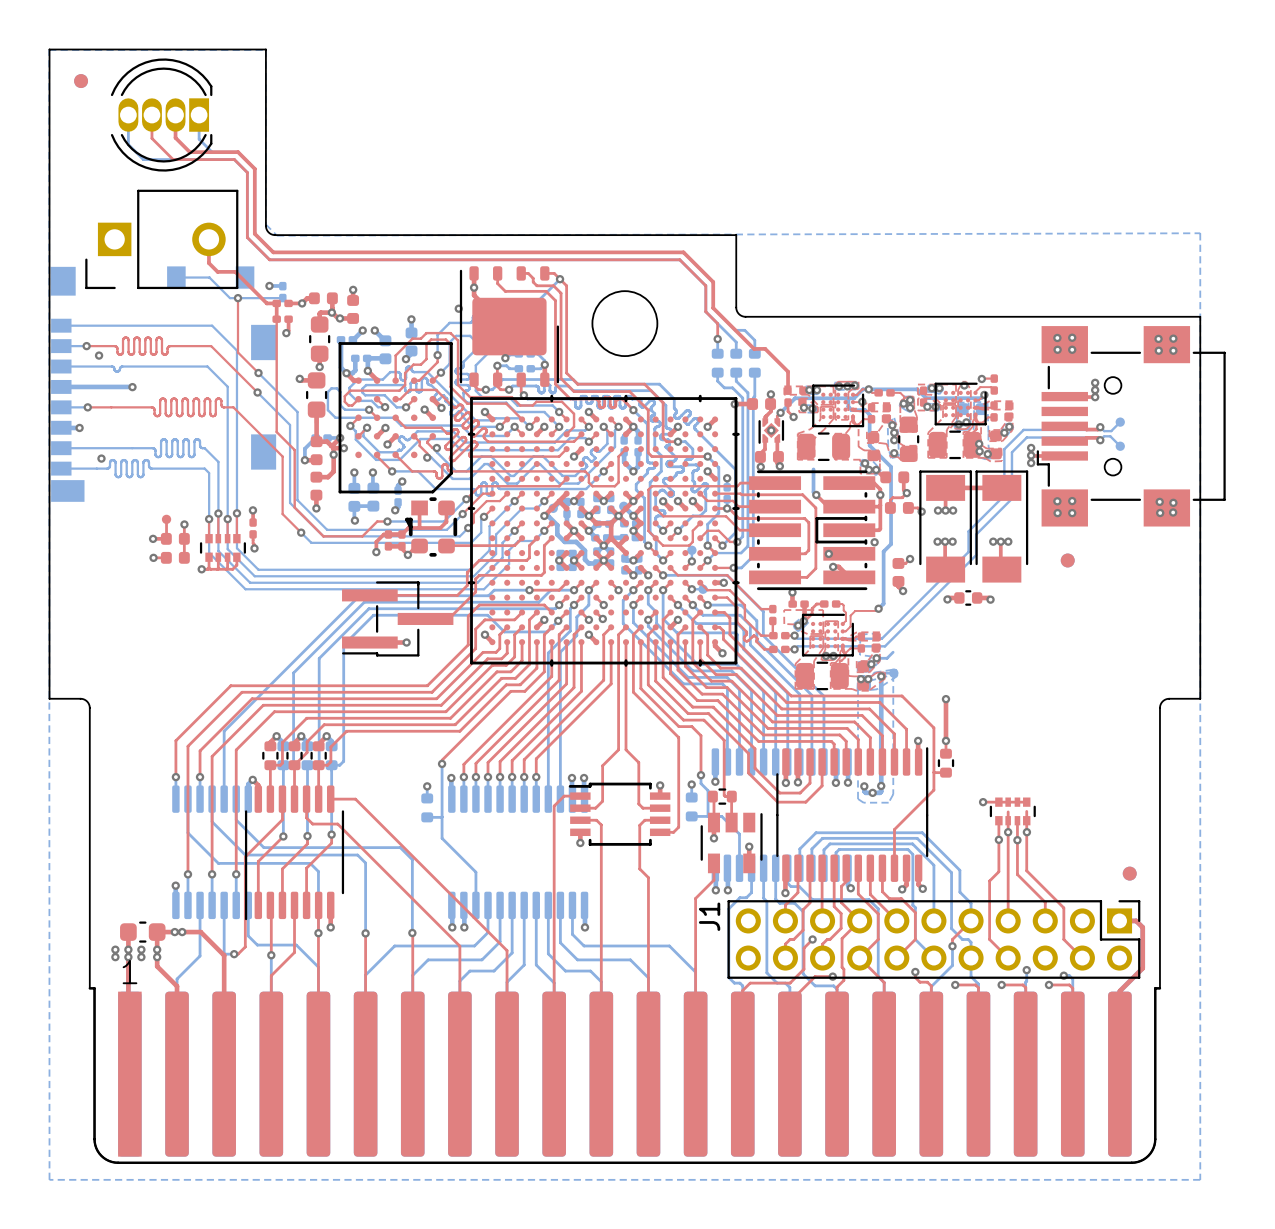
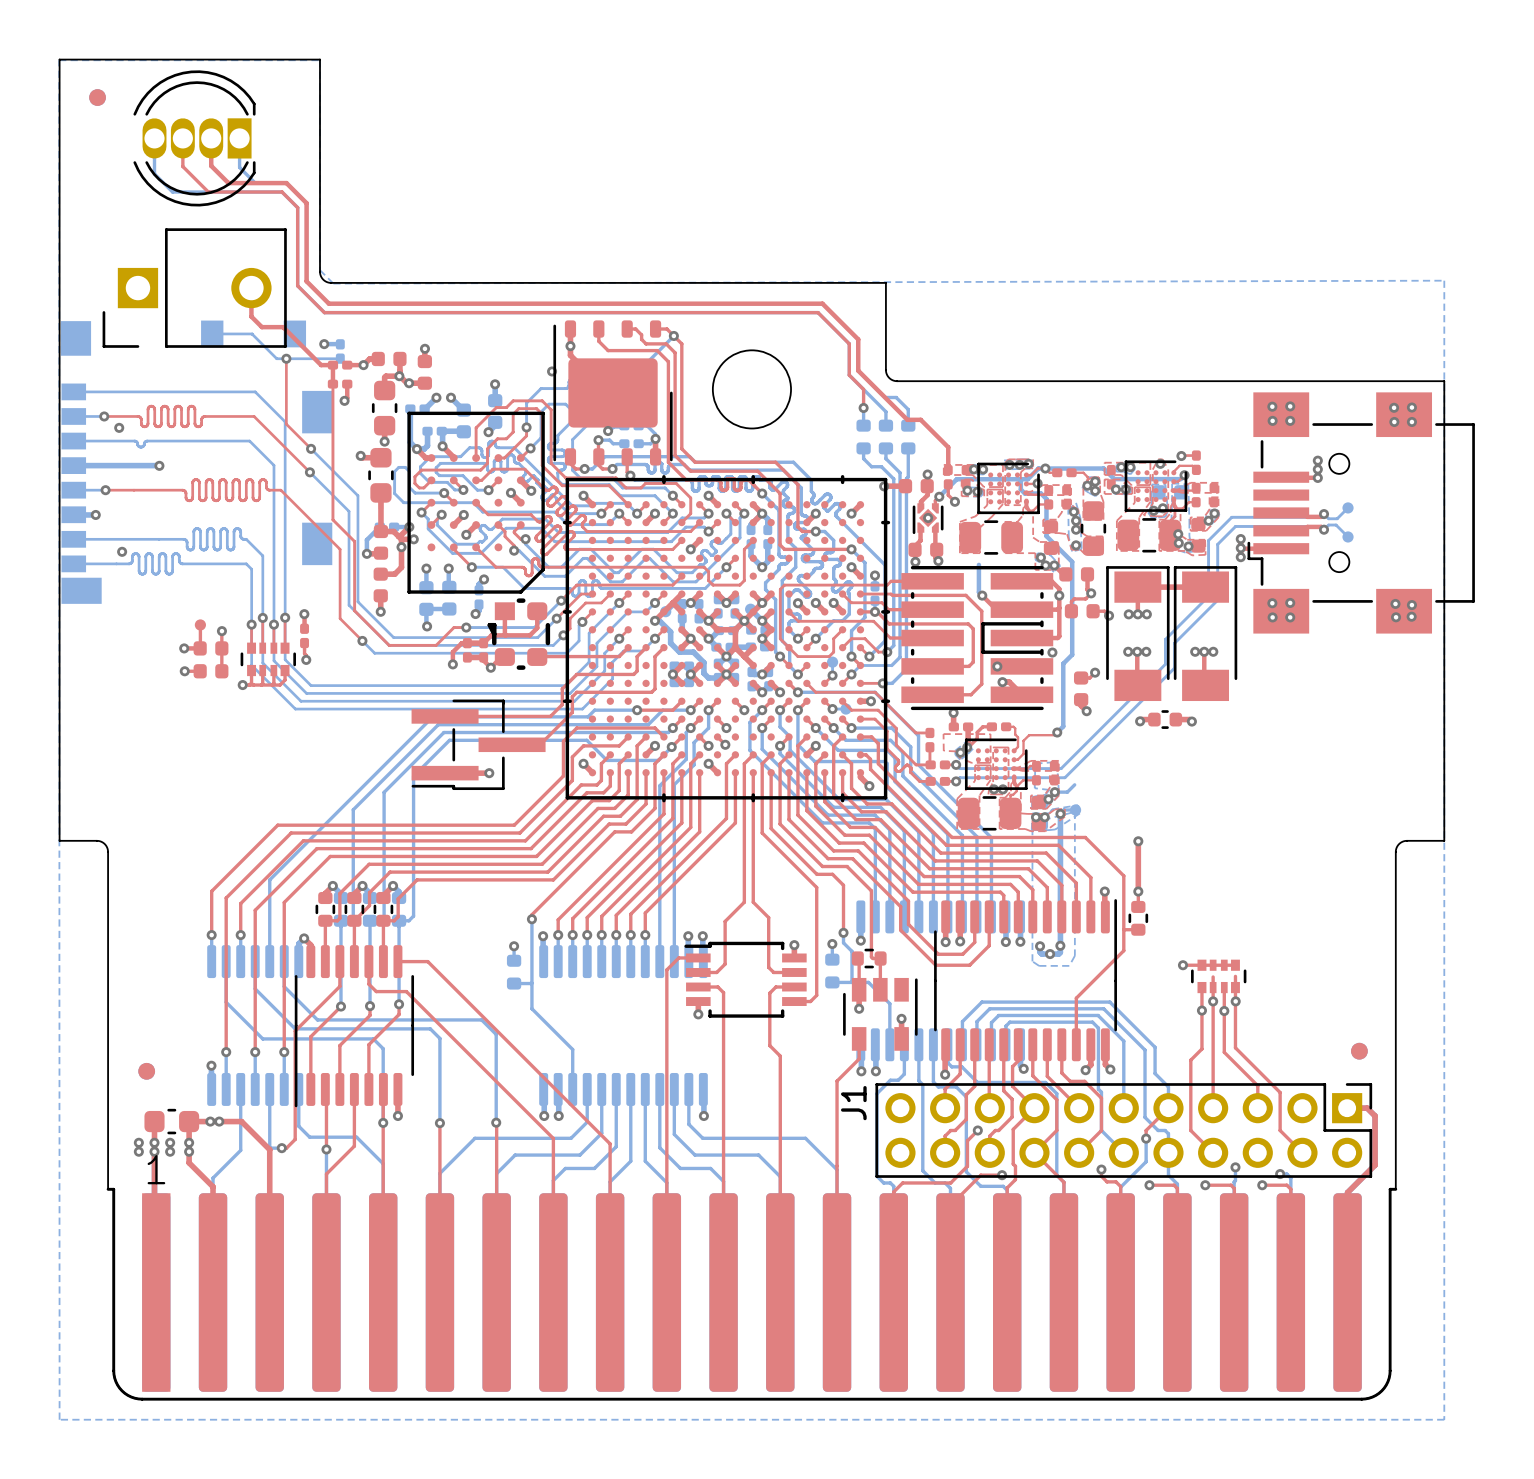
part: (1067, 560) -> none
part: none -> (146, 1071)

